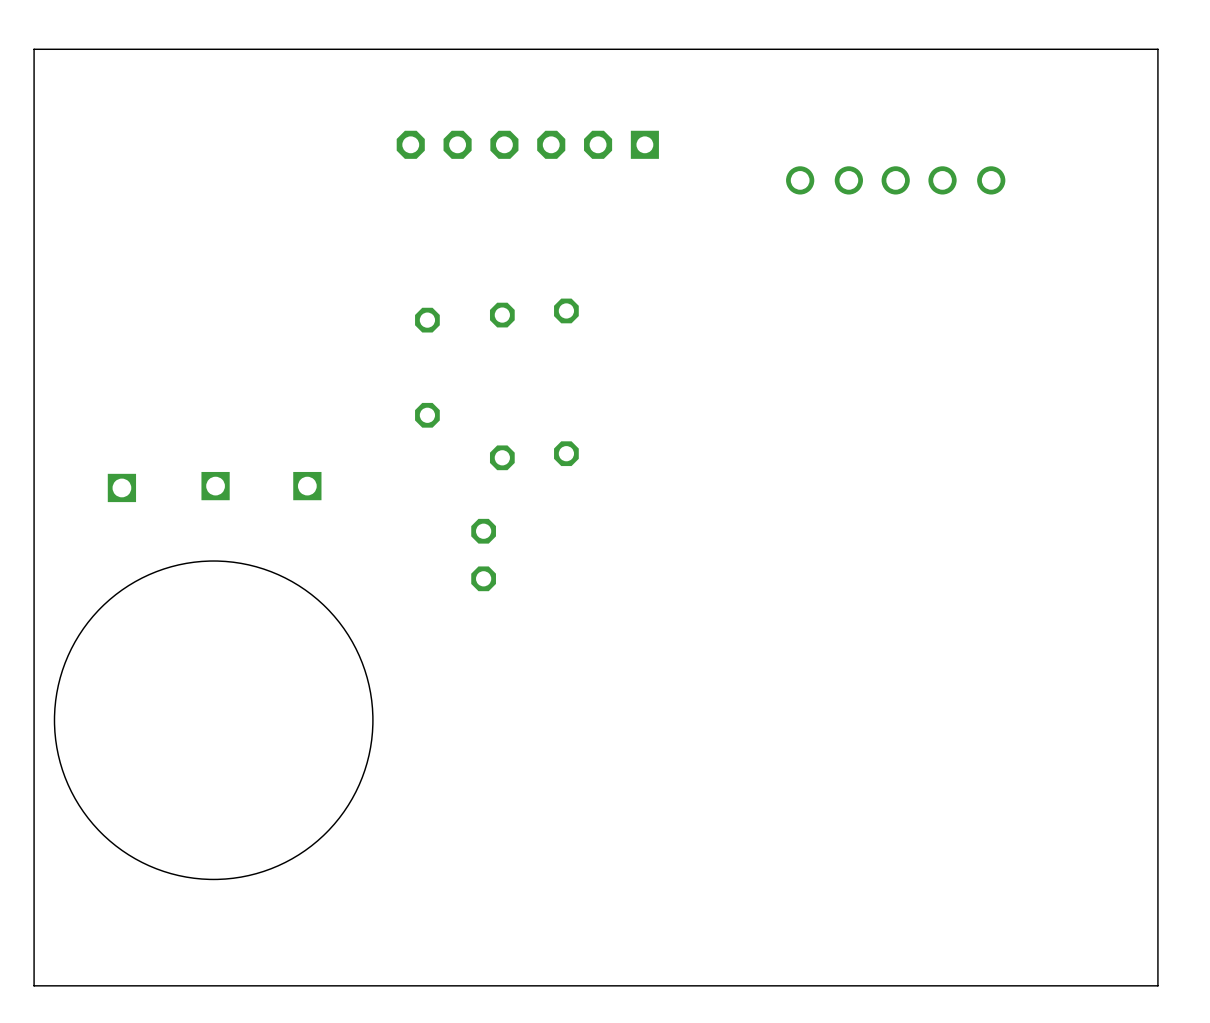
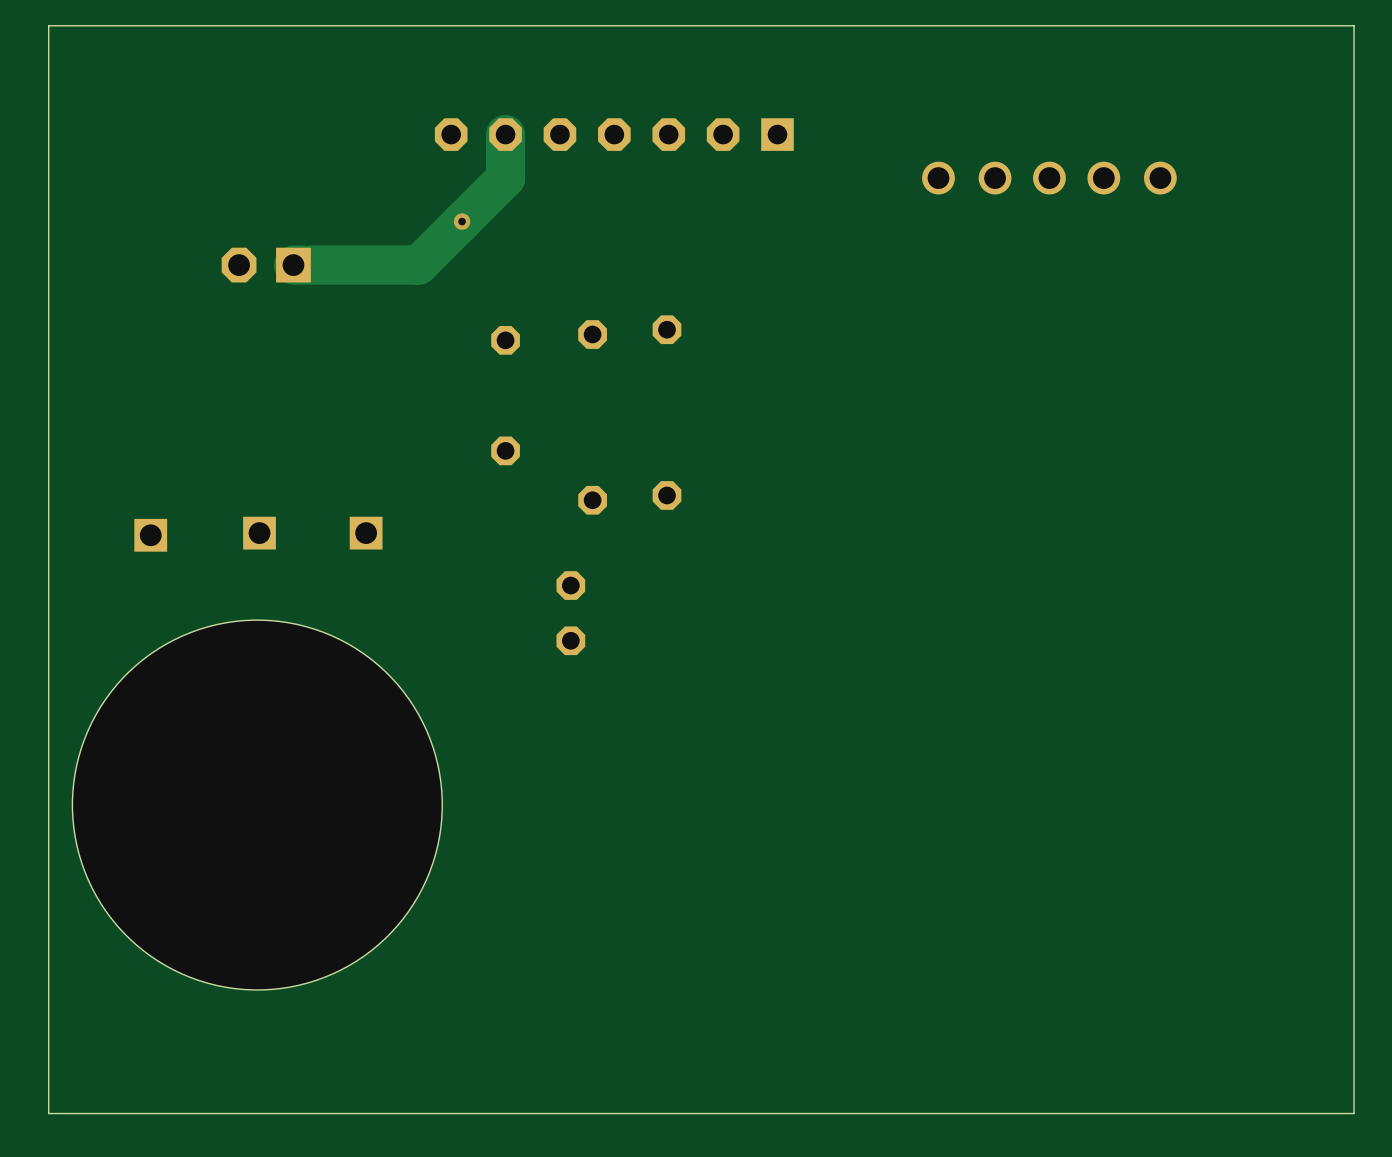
part footprint: [396, 130, 659, 159] -> [434, 118, 794, 151]
track: none -> (505, 134) (505, 178) (418, 265) (293, 265)
via: none -> (462, 221)
part: none -> (266, 265)

